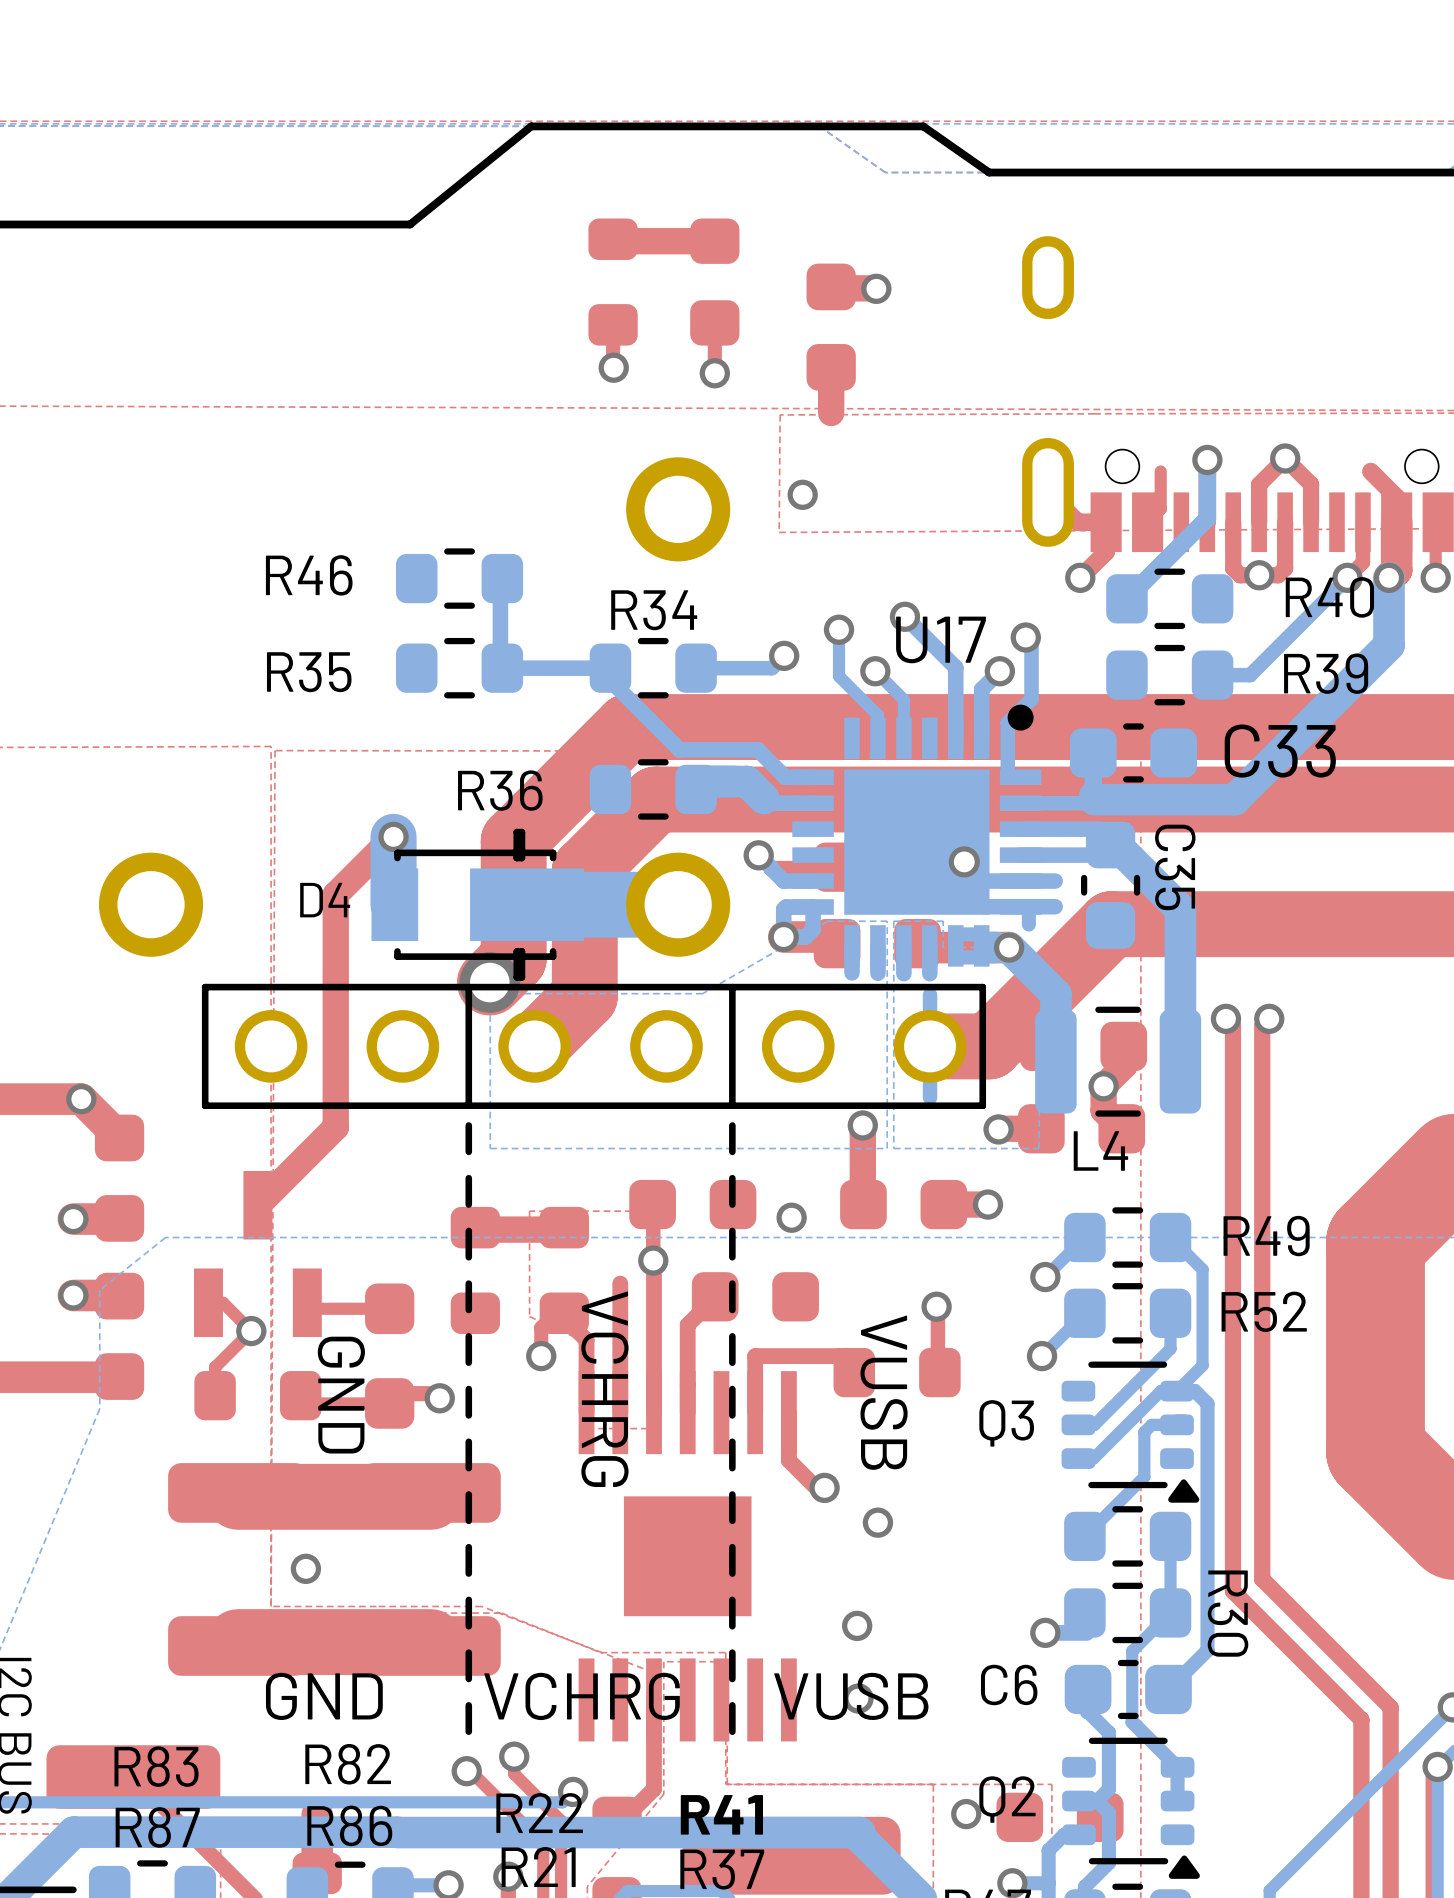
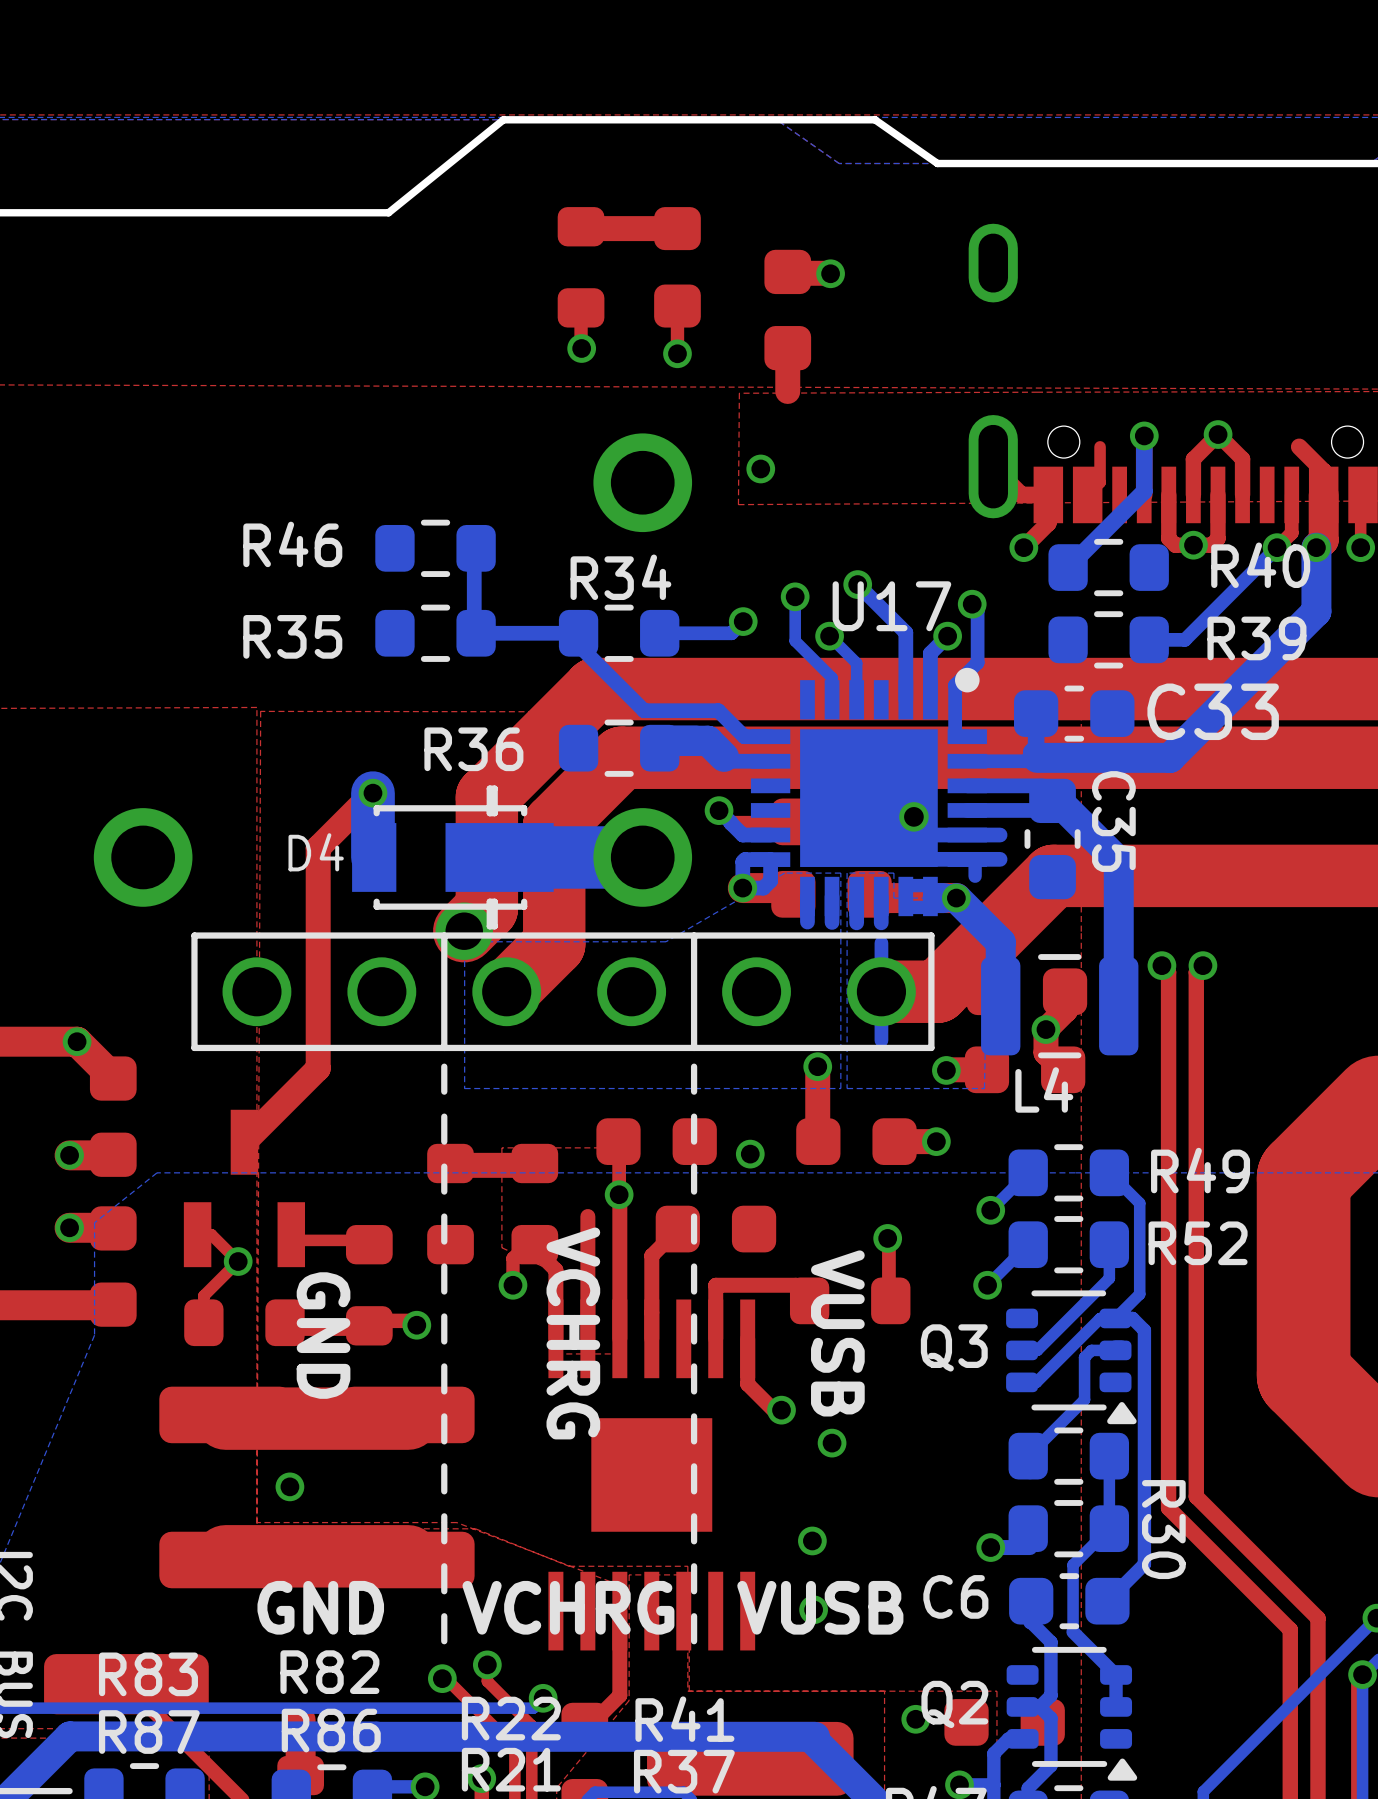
part footprint: [365, 1283, 415, 1429] -> [345, 1225, 393, 1346]

